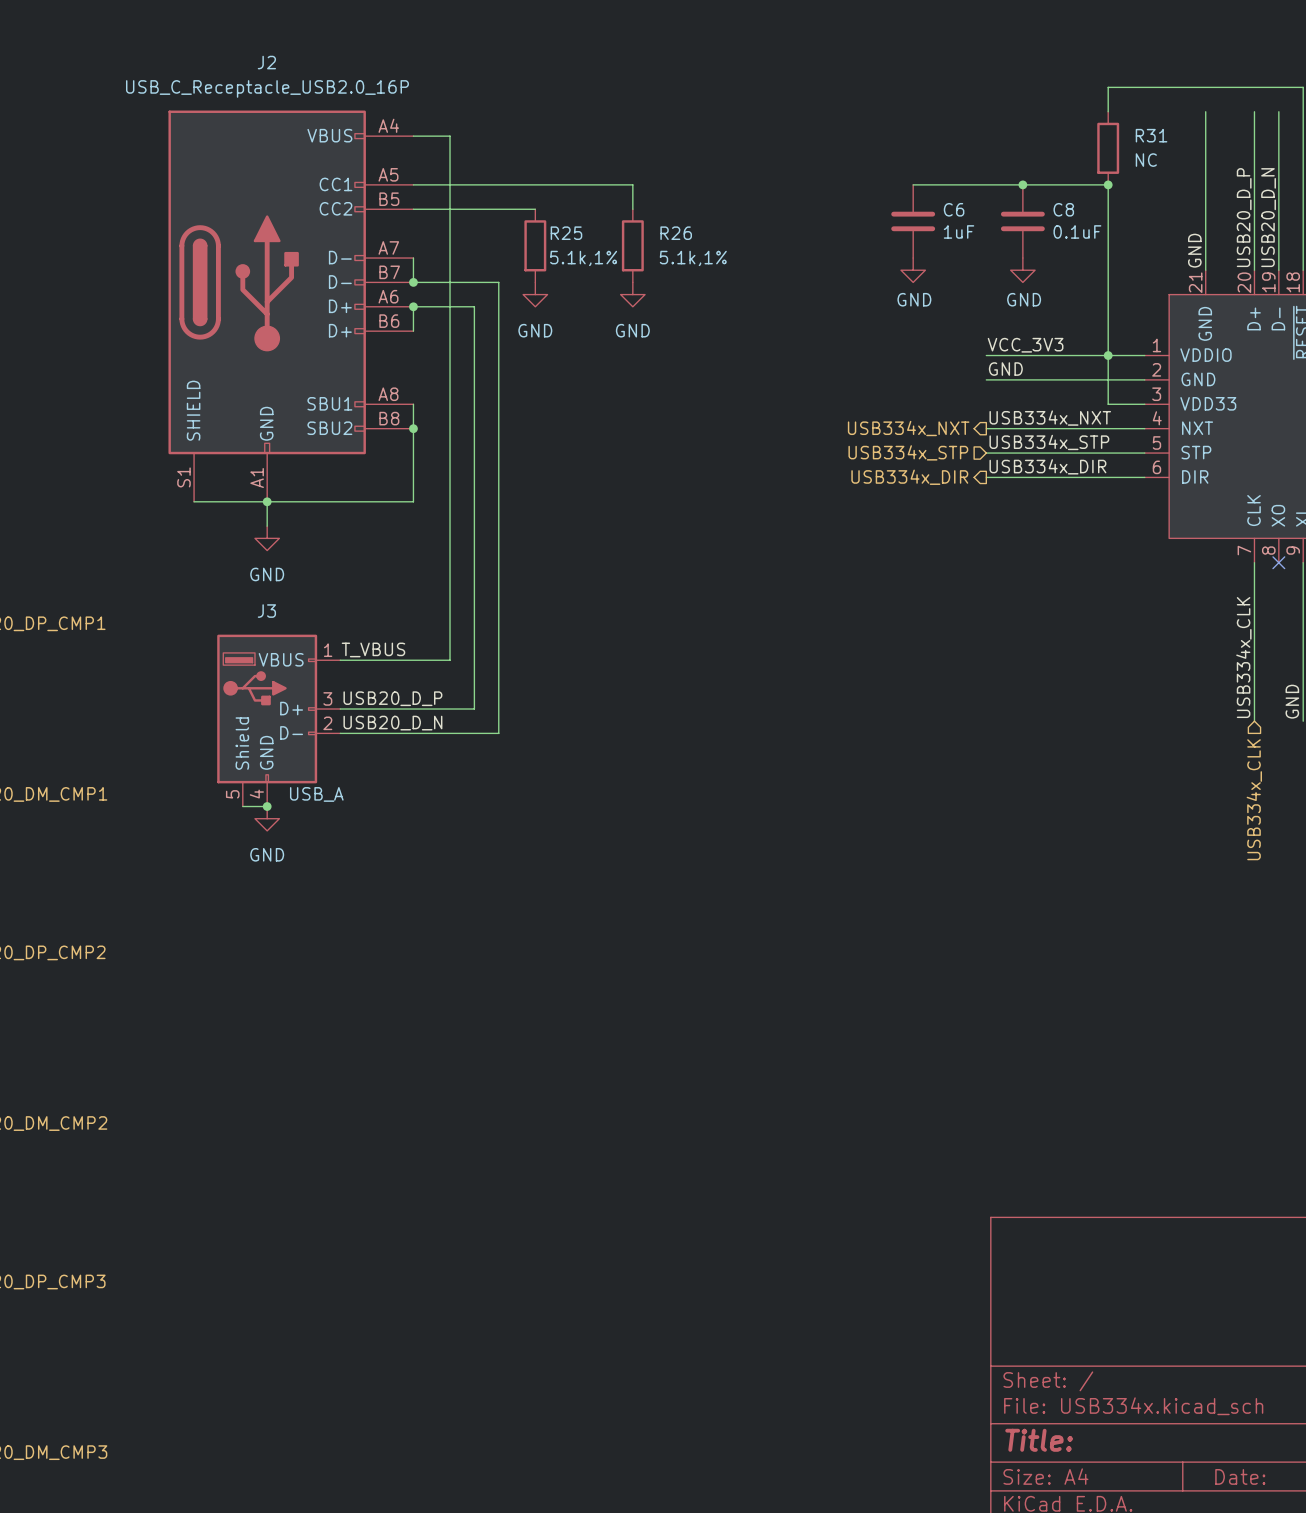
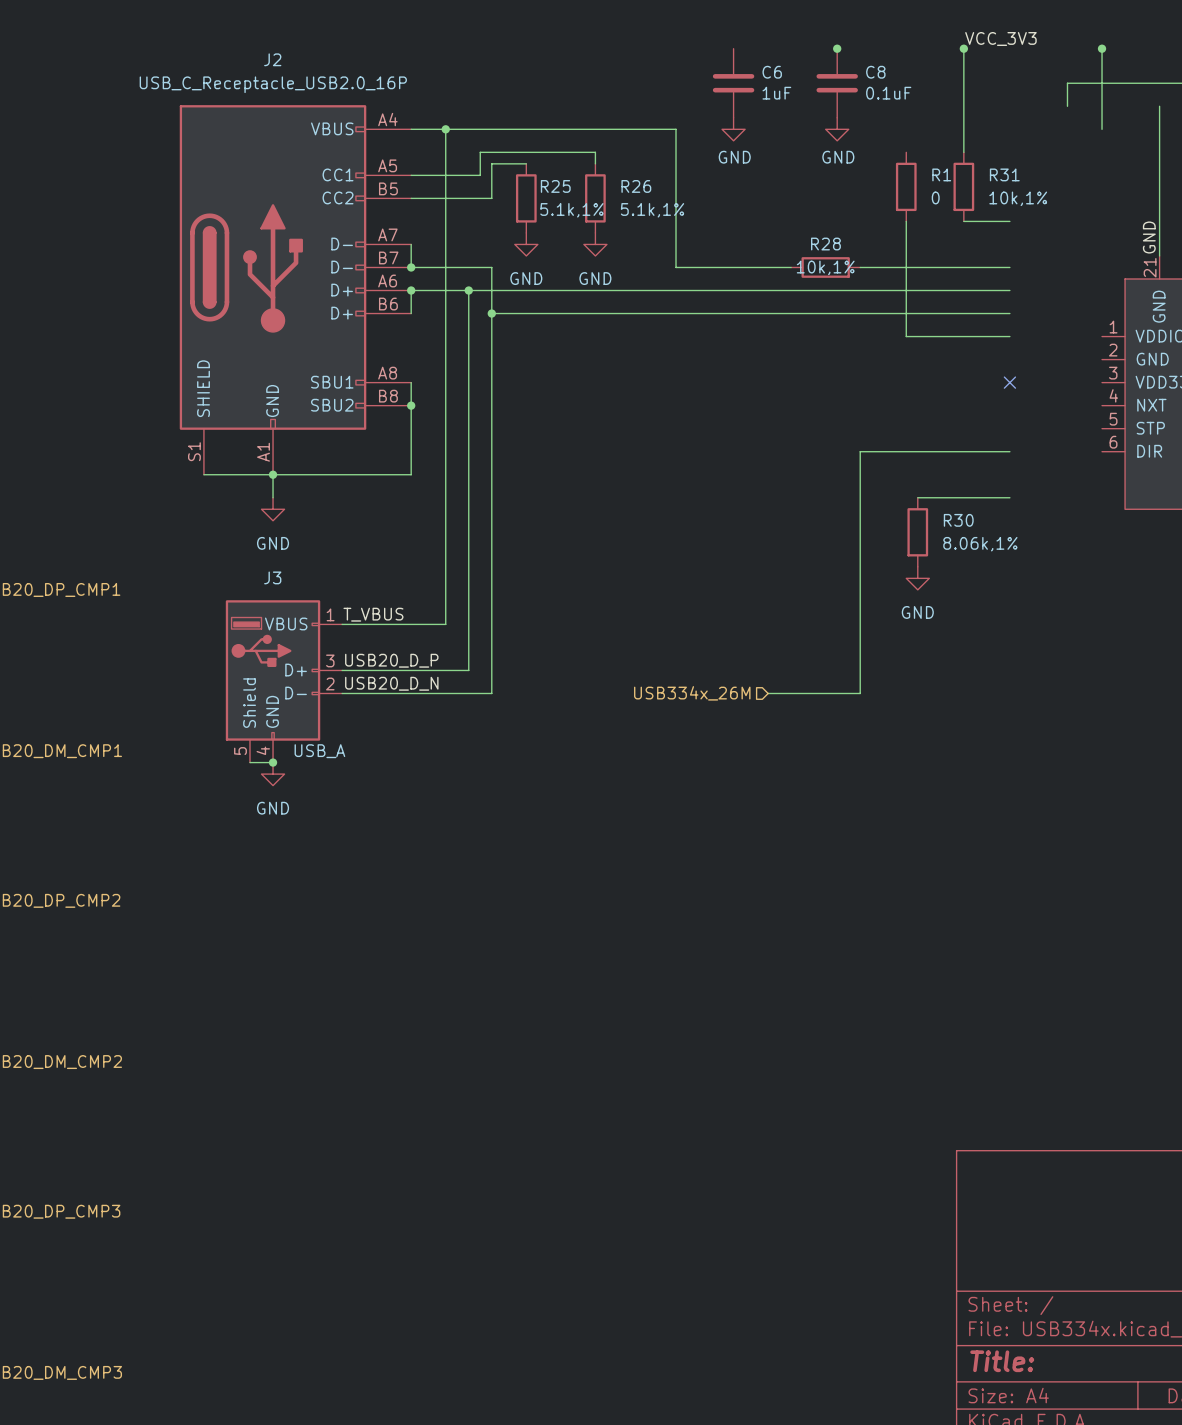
label: none -> VCC_3V3 (1000, 38)
junction: none -> (837, 48)
wire: none -> (963, 48) (963, 152)
junction: none -> (963, 48)
wire: none -> (1102, 48) (1102, 129)
junction: none -> (1102, 48)
wire: none -> (445, 129) (676, 129) (676, 267) (791, 267)
junction: none -> (445, 129)
power symbol: none -> GND (733, 129)
power symbol: none -> GND (837, 129)
R31 position: (1108, 148) -> (963, 186)
R31 value: NC (1146, 160) -> 10k,1% (1018, 198)
wire: (486, 184) (632, 184) (632, 209) -> (480, 175) (480, 152) (595, 152) (595, 163)
wire: (913, 184) (1108, 184) (1108, 404) (1144, 404) -> none
junction: (1022, 184) -> none
junction: (1108, 184) -> none
R1: none -> 0 (906, 186)
wire: (498, 209) (535, 209) -> (491, 198) (491, 163) (526, 163)
C6 position: (913, 221) -> (733, 83)
C8 position: (1022, 221) -> (837, 83)
wire: none -> (906, 221) (906, 336) (952, 336)
wire: none -> (963, 221) (1009, 221)
R25 position: (535, 245) -> (526, 198)
R26 position: (632, 245) -> (595, 198)
power symbol: none -> GND (595, 244)
power symbol: GND (913, 270) -> none
power symbol: GND (1022, 270) -> none
R28: none -> 10k,1% (825, 267)
power symbol position: GND (535, 294) -> GND (526, 244)
power symbol: GND (632, 294) -> none
wire: none -> (468, 290) (1009, 290)
junction: none -> (468, 290)
wire: none -> (491, 313) (1009, 313)
junction: none -> (491, 313)
label: VCC_3V3 (1025, 345) -> none
wire: (1047, 355) (1144, 355) -> none
junction: (1108, 355) -> none
label: GND (1005, 369) -> none
wire: (986, 379) (1144, 379) -> (860, 267) (1009, 267)
no-connect mark: none -> (1009, 382)
label: USB334x_NXT (1050, 418) -> none
hierarchical label: USB334x_NXT (908, 428) -> none
wire: (986, 428) (1144, 428) -> none
label: USB334x_STP (1049, 442) -> none
hierarchical label: USB334x_STP (908, 452) -> none
wire: (986, 453) (1144, 453) -> none
label: USB334x_DIR (1047, 466) -> none
hierarchical label: USB334x_DIR (909, 477) -> none
wire: none -> (952, 451) (860, 451) (860, 693) (768, 693)
wire: (1047, 477) (1144, 477) -> (917, 497) (1009, 497)
R30: none -> 8.06k,1% (917, 532)
power symbol: none -> GND (917, 578)
hierarchical label: none -> USB334x_26M (692, 693)

